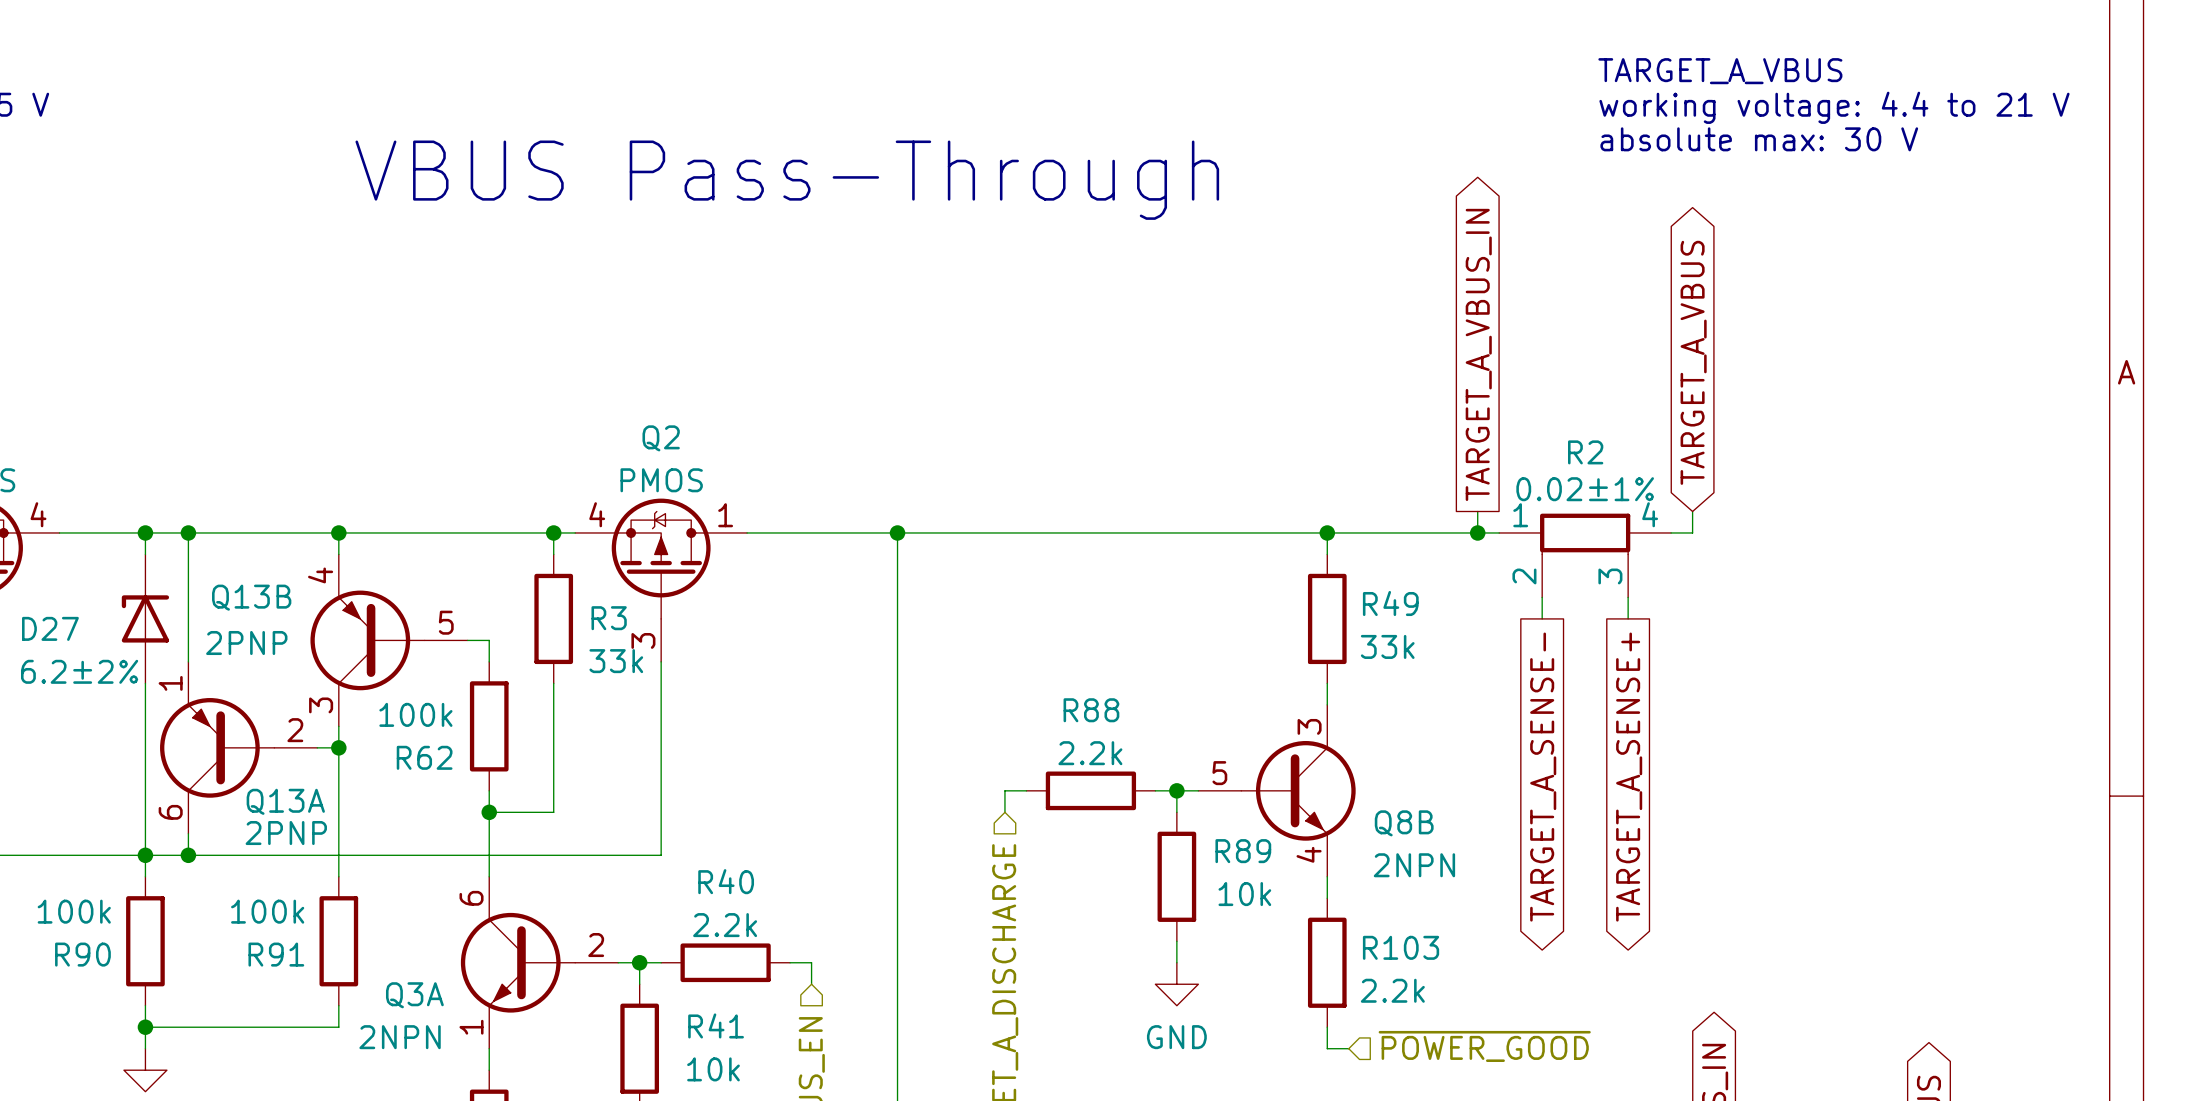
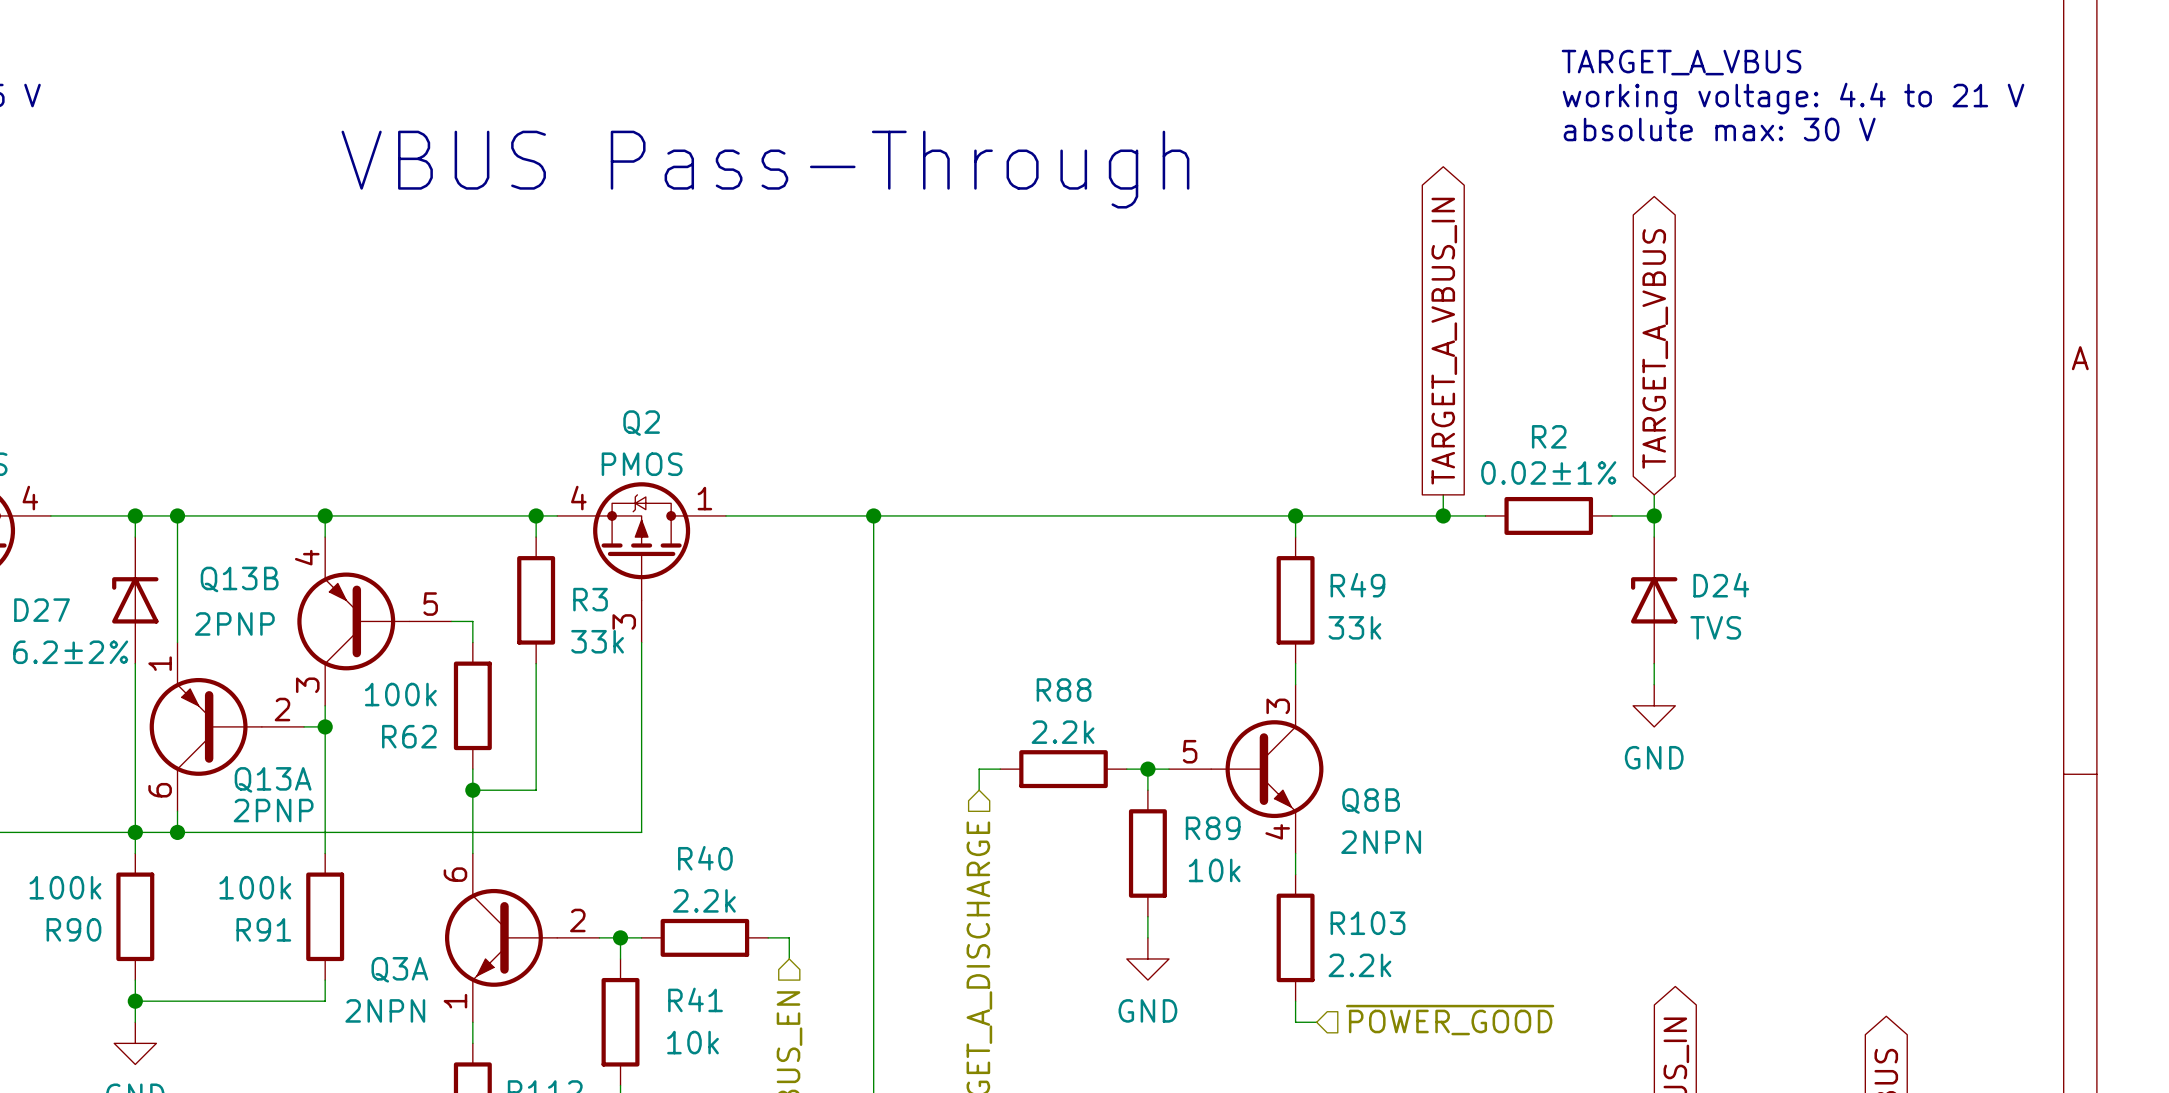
R2 symbol: [1499, 513, 1672, 598] -> [1485, 496, 1613, 535]
junction: none -> (1654, 515)
wire: (1542, 597) (1542, 618) -> (1654, 663) (1654, 684)
wire: (1628, 597) (1628, 618) -> (1654, 515) (1654, 537)
D24: none -> TVS (1654, 600)
power symbol: none -> GND (1654, 705)
global label: TARGET_A_SENSE- (1543, 777) -> none
global label: TARGET_A_SENSE+ (1629, 777) -> none

